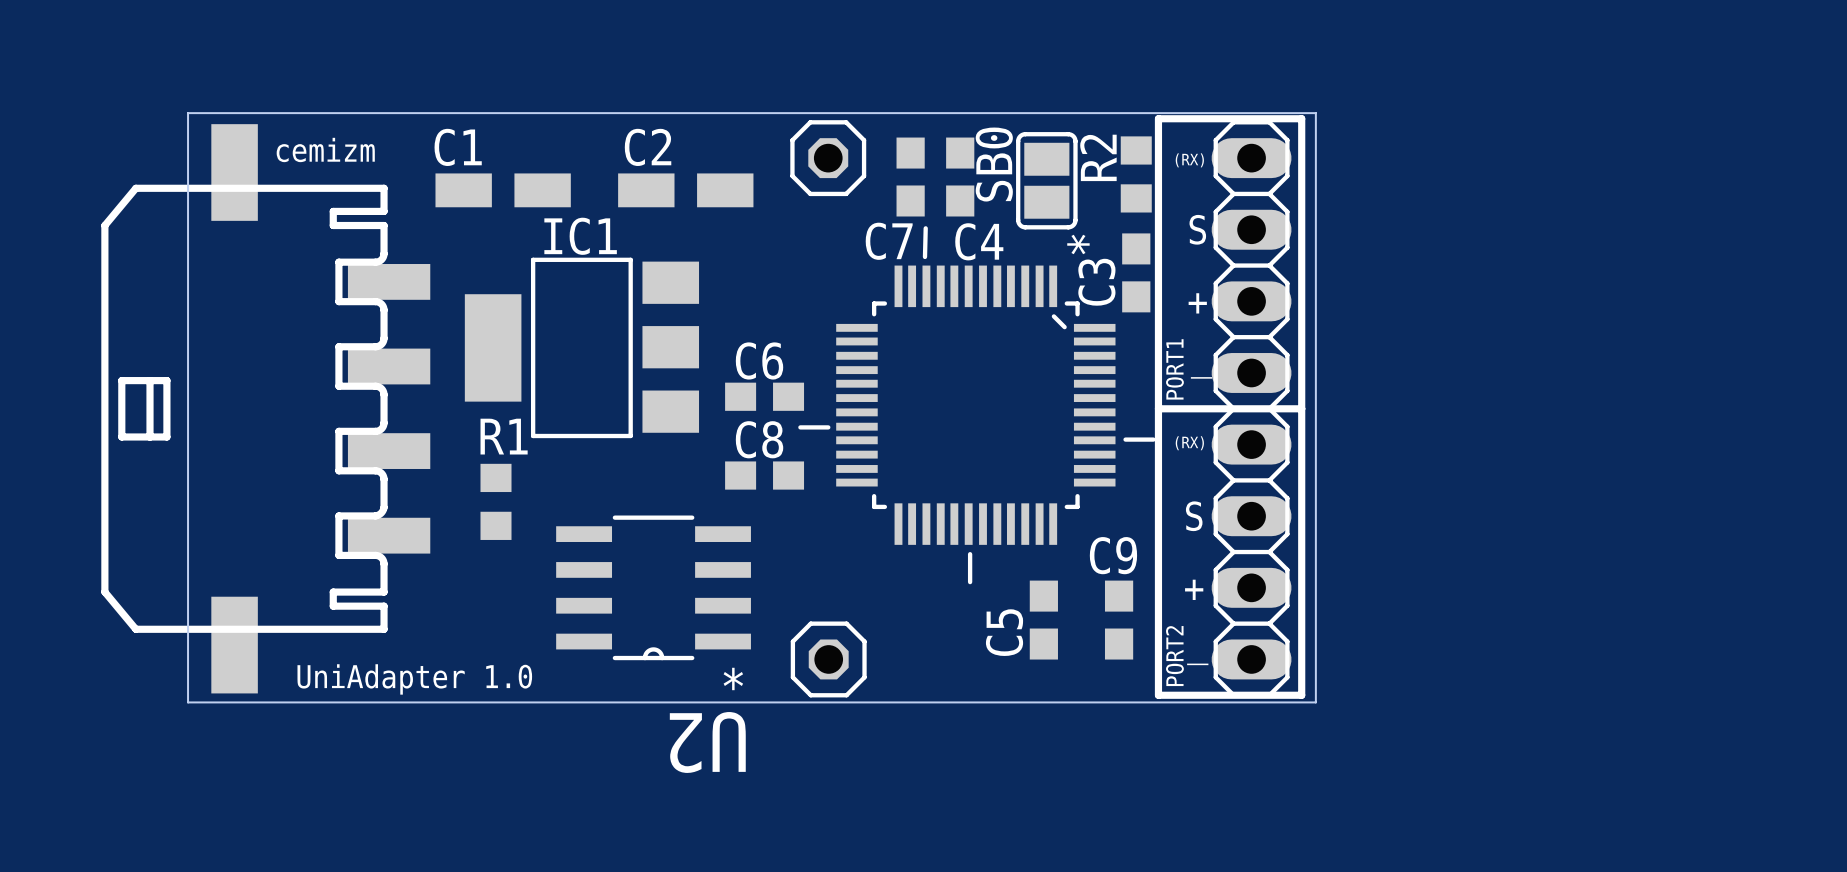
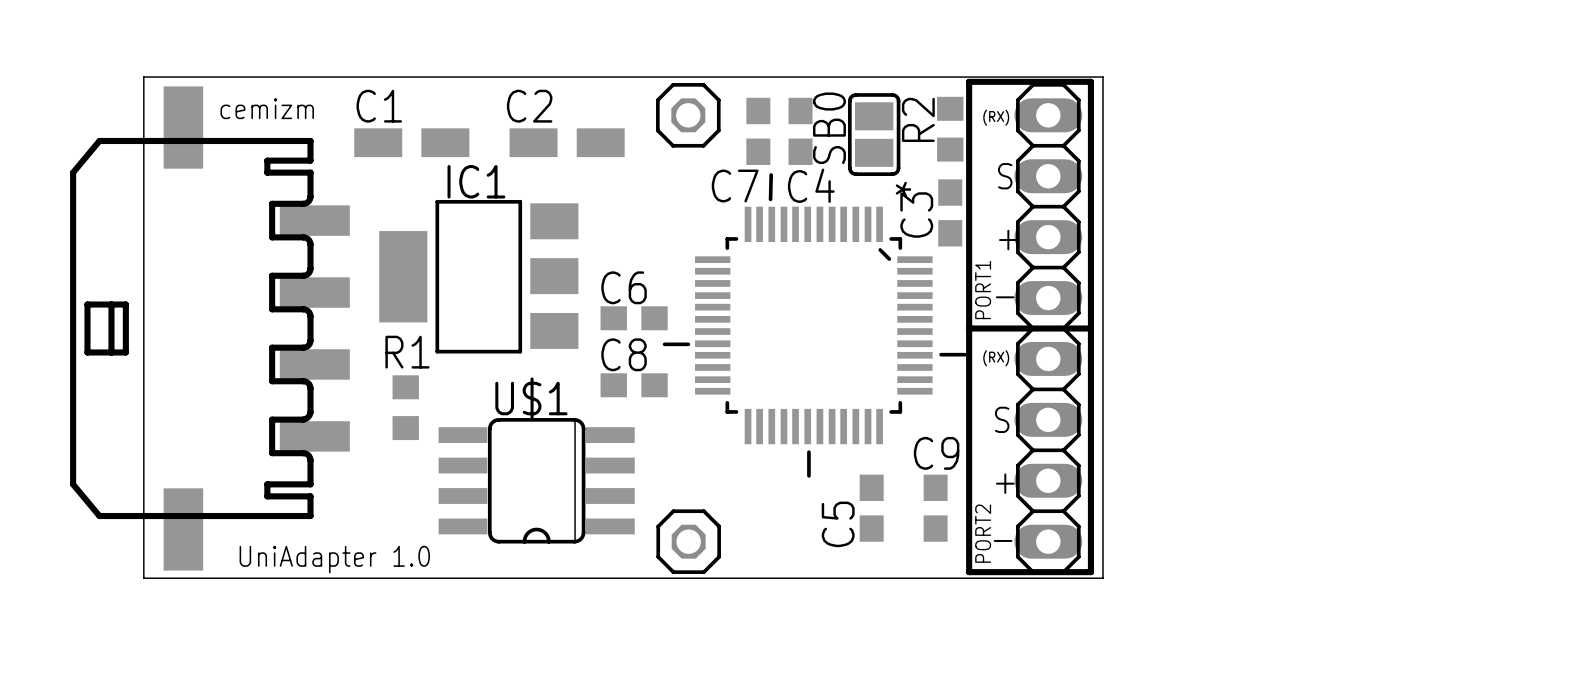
U$1: none -> (536, 480)
U2: (653, 587) -> none

